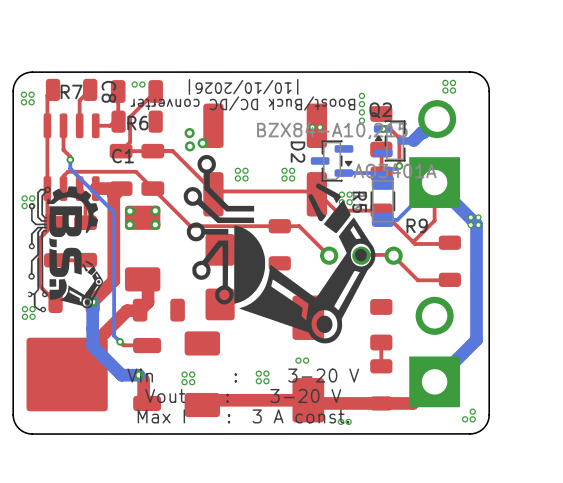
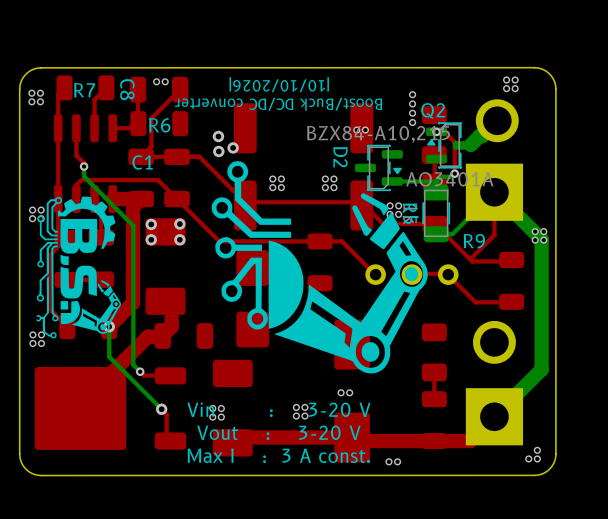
bottom track width: thick (92, 301) (92, 328) -> thin (109, 326) (109, 356)
bottom track: (92, 328) (92, 346) (121, 375) (139, 375) -> (109, 356) (163, 411)
top track width: thick (143, 379) (143, 403) -> thin (166, 414) (166, 440)

